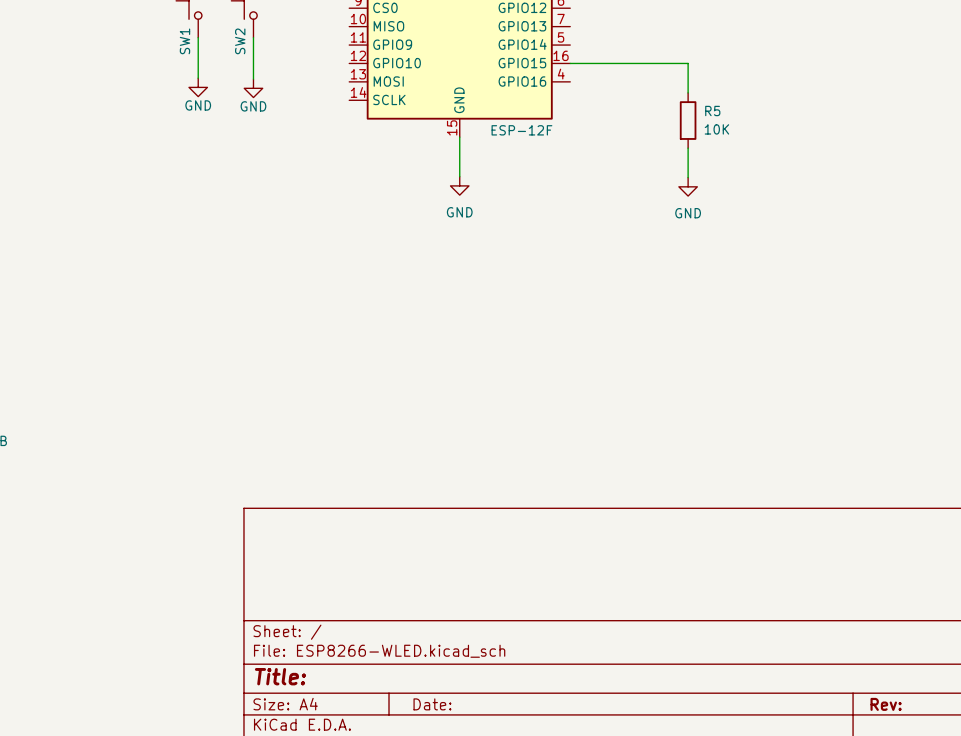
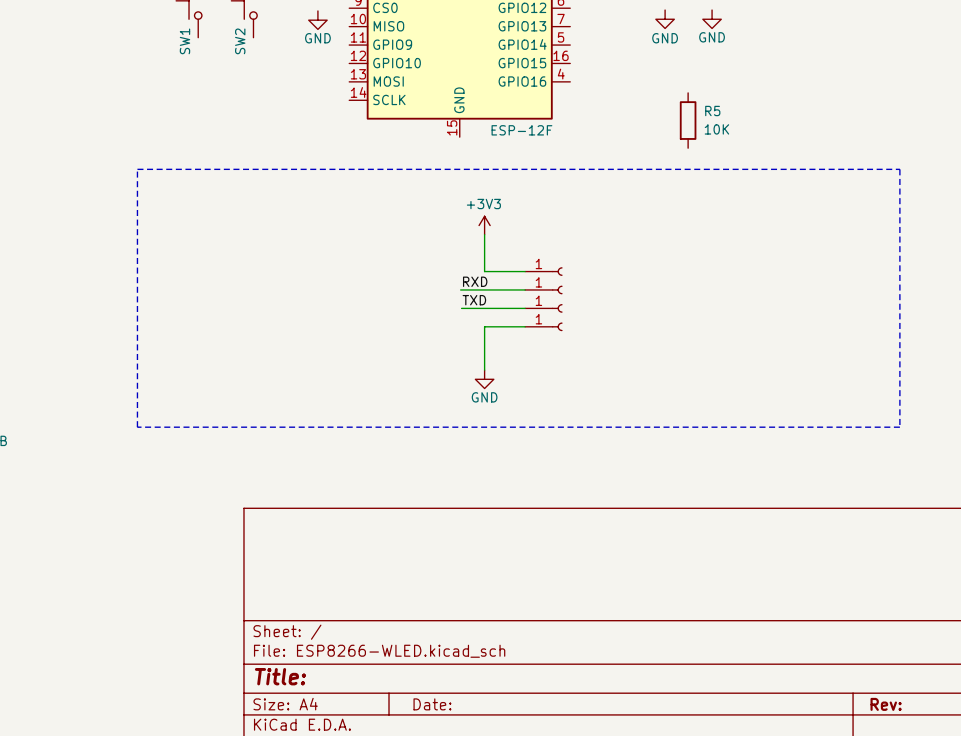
power symbol: none -> GND (665, 19)
power symbol: none -> GND (712, 19)
power symbol: none -> GND (317, 20)
wire: (198, 37) (198, 78) -> none
wire: (253, 37) (253, 79) -> none
wire: (570, 63) (688, 63) (688, 92) -> none
power symbol: GND (198, 87) -> none
power symbol: GND (253, 88) -> none
wire: (459, 137) (459, 176) -> none
wire: (688, 148) (688, 177) -> none
line: none -> (137, 169) (899, 169) (899, 427) (137, 427) (137, 169)
power symbol: GND (459, 185) -> none
power symbol: GND (688, 186) -> none
power symbol: none -> +3V3 (484, 225)
wire: none -> (484, 234) (484, 271) (525, 271)
part: none -> (543, 271)
label: none -> RXD (475, 281)
wire: none -> (460, 289) (525, 289)
part: none -> (543, 289)
label: none -> TXD (474, 300)
wire: none -> (461, 308) (525, 308)
part: none -> (543, 308)
wire: none -> (525, 326) (484, 326) (484, 370)
part: none -> (543, 326)
power symbol: none -> GND (484, 379)

